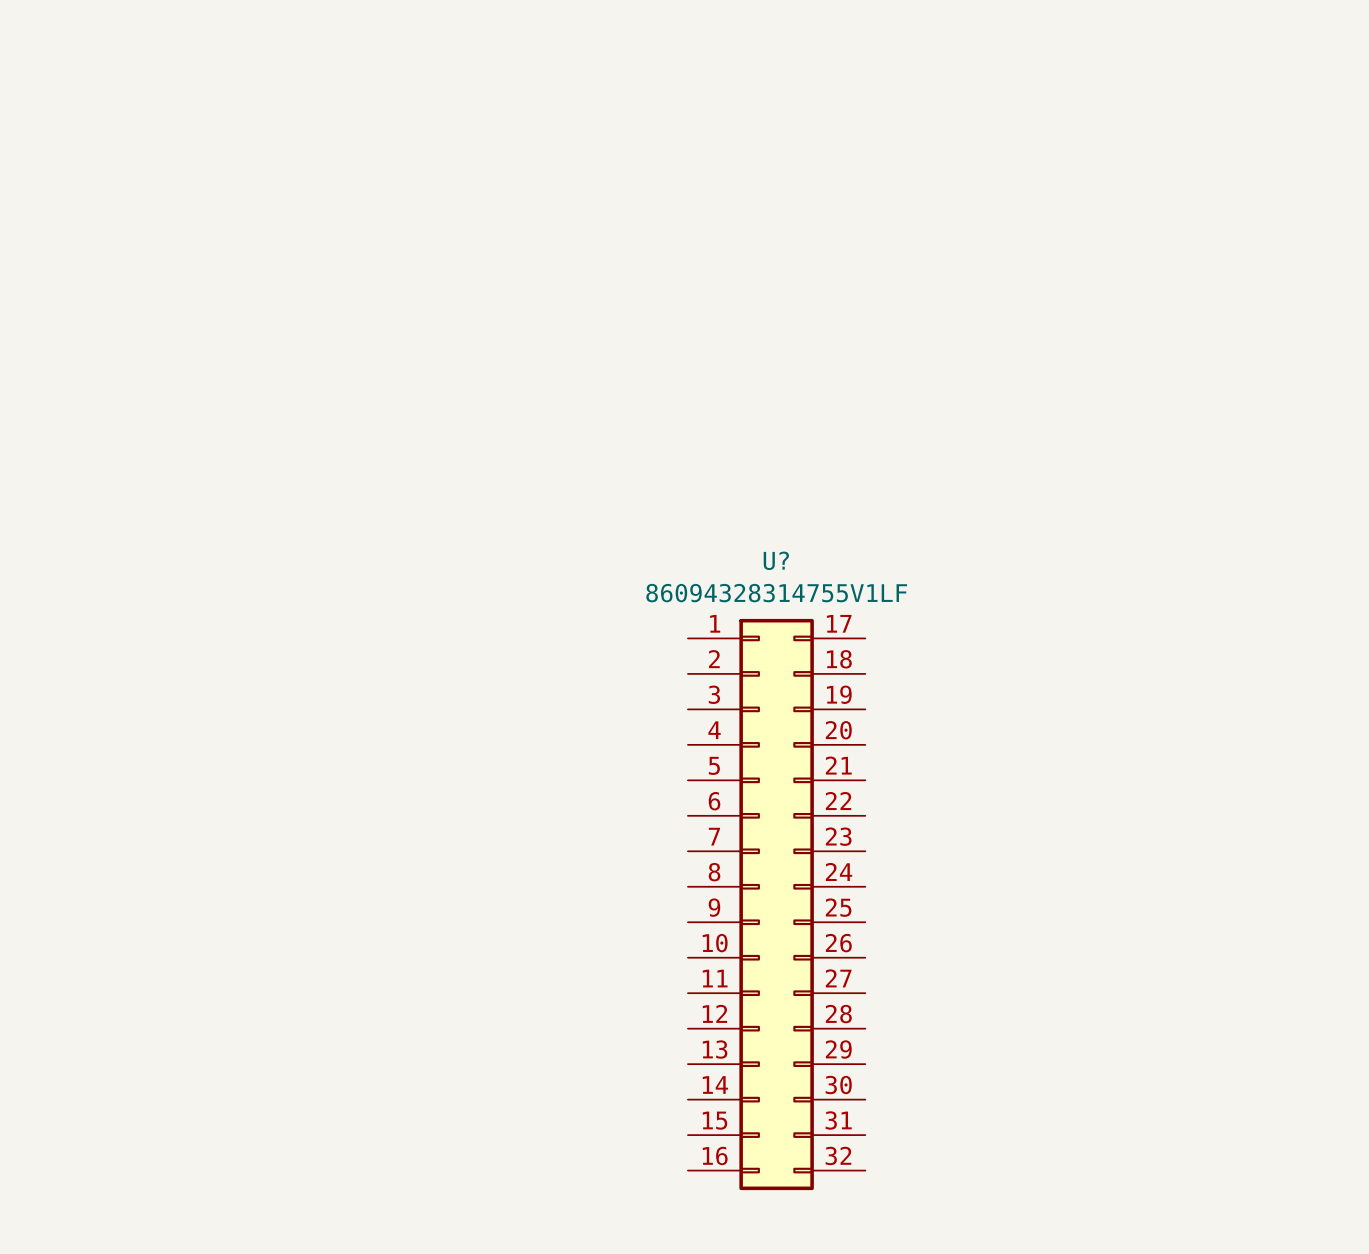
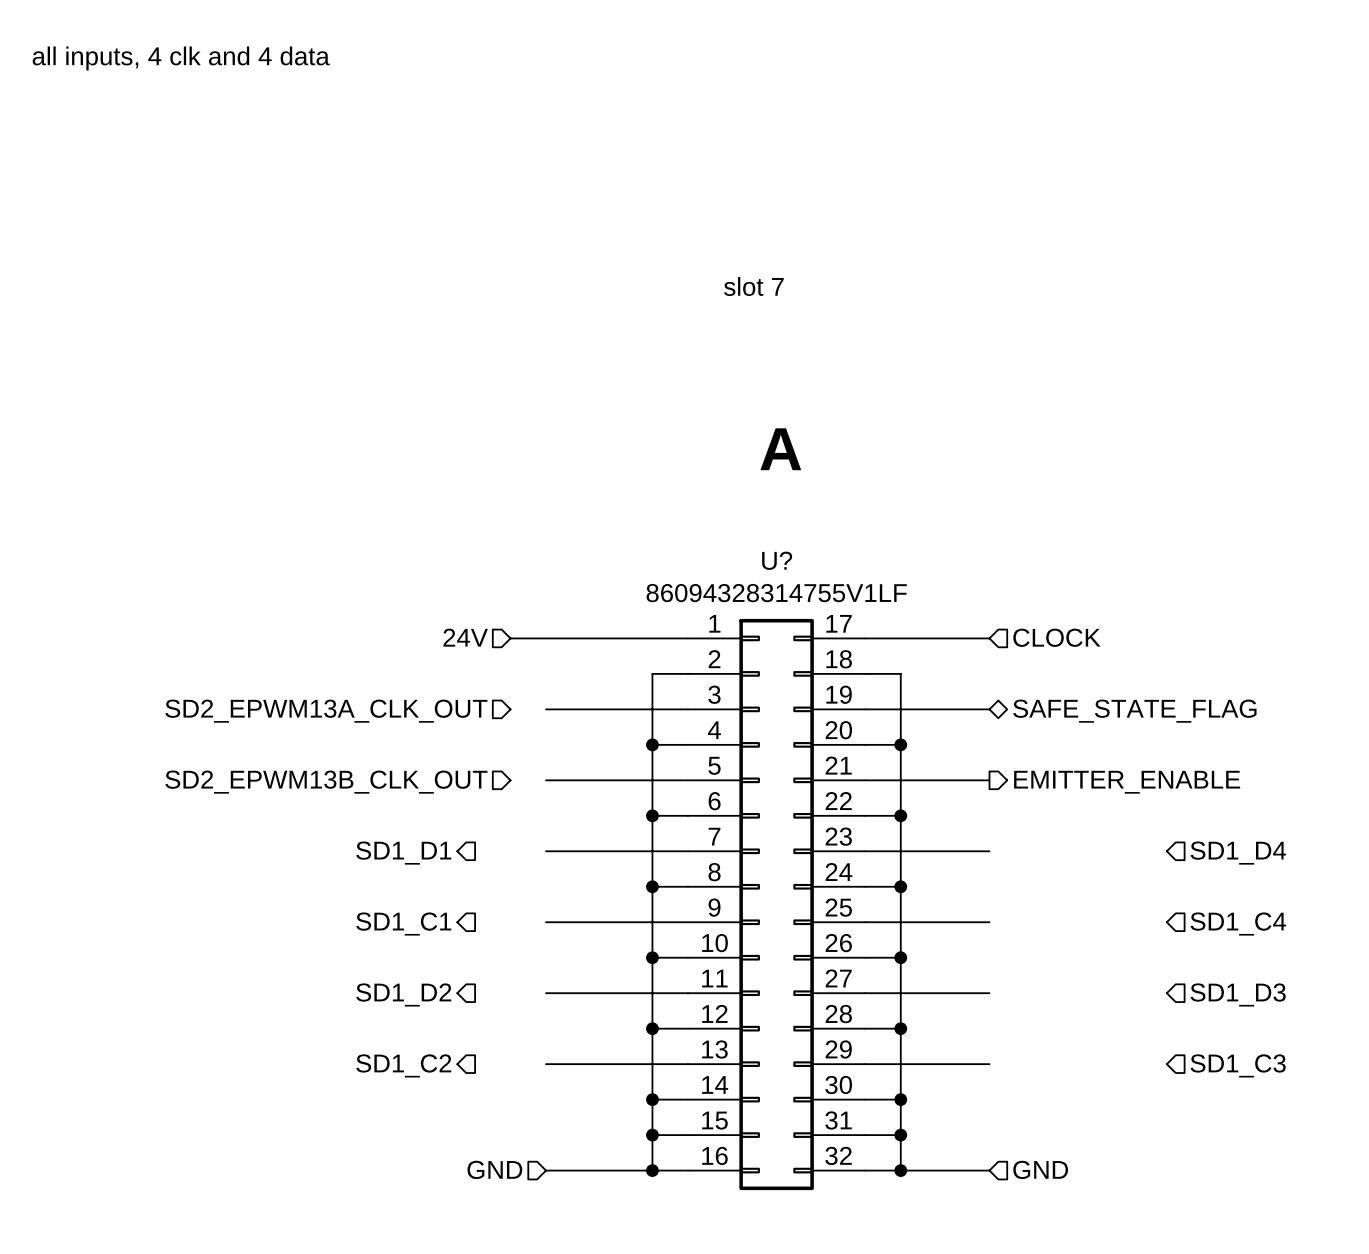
text: none -> all inputs, 4 clk and 4 data (181, 58)
text: none -> slot 7 (753, 286)
text: none -> A (780, 449)
hierarchical label: none -> 24V (465, 637)
hierarchical label: none -> CLOCK (1056, 637)
wire: none -> (510, 638) (687, 638)
wire: none -> (865, 638) (989, 638)
wire: none -> (687, 673) (652, 673) (652, 1170)
wire: none -> (865, 673) (900, 673) (900, 1170)
wire: none -> (546, 709) (687, 709)
wire: none -> (865, 709) (989, 709)
hierarchical label: none -> SD2_EPWM13A_CLK_OUT (326, 711)
hierarchical label: none -> SAFE_STATE_FLAG (1134, 711)
wire: none -> (652, 744) (687, 744)
junction: none -> (652, 744)
wire: none -> (865, 744) (900, 744)
junction: none -> (900, 744)
wire: none -> (546, 780) (687, 780)
wire: none -> (865, 780) (989, 780)
hierarchical label: none -> SD2_EPWM13B_CLK_OUT (326, 782)
hierarchical label: none -> EMITTER_ENABLE (1127, 782)
wire: none -> (652, 815) (687, 815)
junction: none -> (652, 815)
wire: none -> (865, 815) (900, 815)
junction: none -> (900, 815)
wire: none -> (546, 851) (687, 851)
wire: none -> (865, 851) (989, 851)
hierarchical label: none -> SD1_D1 (403, 853)
hierarchical label: none -> SD1_D4 (1238, 853)
wire: none -> (652, 886) (687, 886)
junction: none -> (652, 886)
wire: none -> (865, 886) (900, 886)
junction: none -> (900, 886)
wire: none -> (546, 922) (687, 922)
wire: none -> (865, 922) (989, 922)
hierarchical label: none -> SD1_C1 (403, 924)
hierarchical label: none -> SD1_C4 (1238, 924)
wire: none -> (652, 957) (687, 957)
junction: none -> (652, 957)
wire: none -> (865, 957) (900, 957)
junction: none -> (900, 957)
wire: none -> (546, 993) (687, 993)
wire: none -> (865, 993) (989, 993)
hierarchical label: none -> SD1_D2 (403, 994)
hierarchical label: none -> SD1_D3 (1238, 994)
wire: none -> (652, 1028) (687, 1028)
junction: none -> (652, 1028)
wire: none -> (865, 1028) (900, 1028)
junction: none -> (900, 1028)
wire: none -> (546, 1064) (687, 1064)
wire: none -> (865, 1064) (989, 1064)
hierarchical label: none -> SD1_C2 (403, 1065)
hierarchical label: none -> SD1_C3 (1238, 1065)
wire: none -> (652, 1099) (687, 1099)
junction: none -> (652, 1099)
wire: none -> (865, 1099) (900, 1099)
junction: none -> (900, 1099)
wire: none -> (652, 1135) (687, 1135)
junction: none -> (652, 1135)
wire: none -> (865, 1135) (900, 1135)
junction: none -> (900, 1135)
hierarchical label: none -> GND (494, 1169)
hierarchical label: none -> GND (1040, 1169)
wire: none -> (546, 1170) (687, 1170)
junction: none -> (652, 1170)
wire: none -> (865, 1170) (989, 1170)
junction: none -> (900, 1170)

